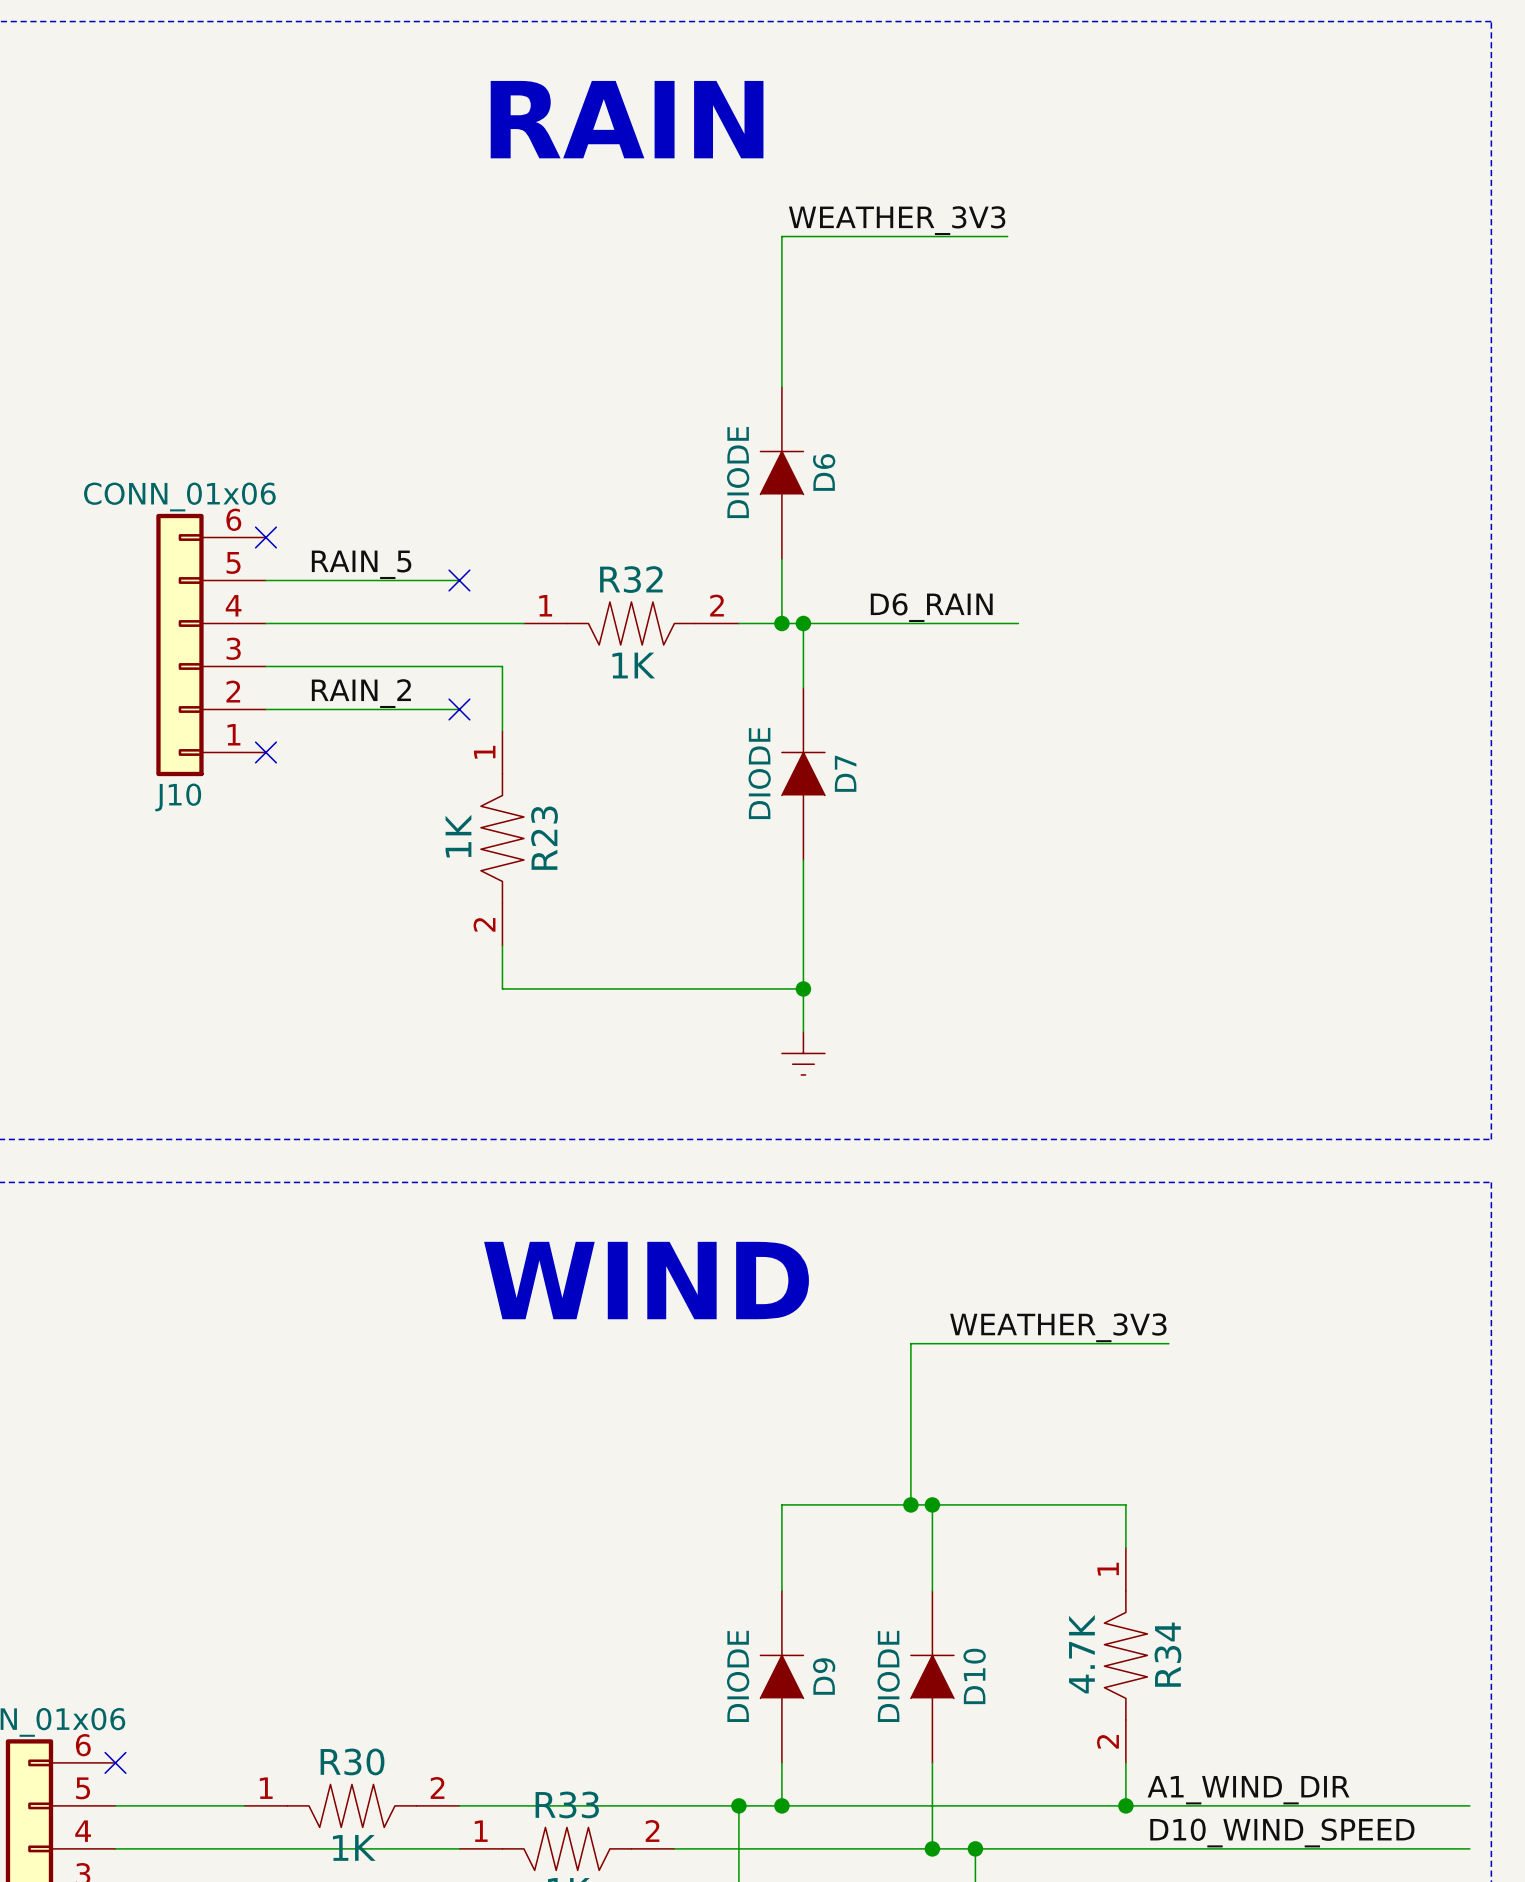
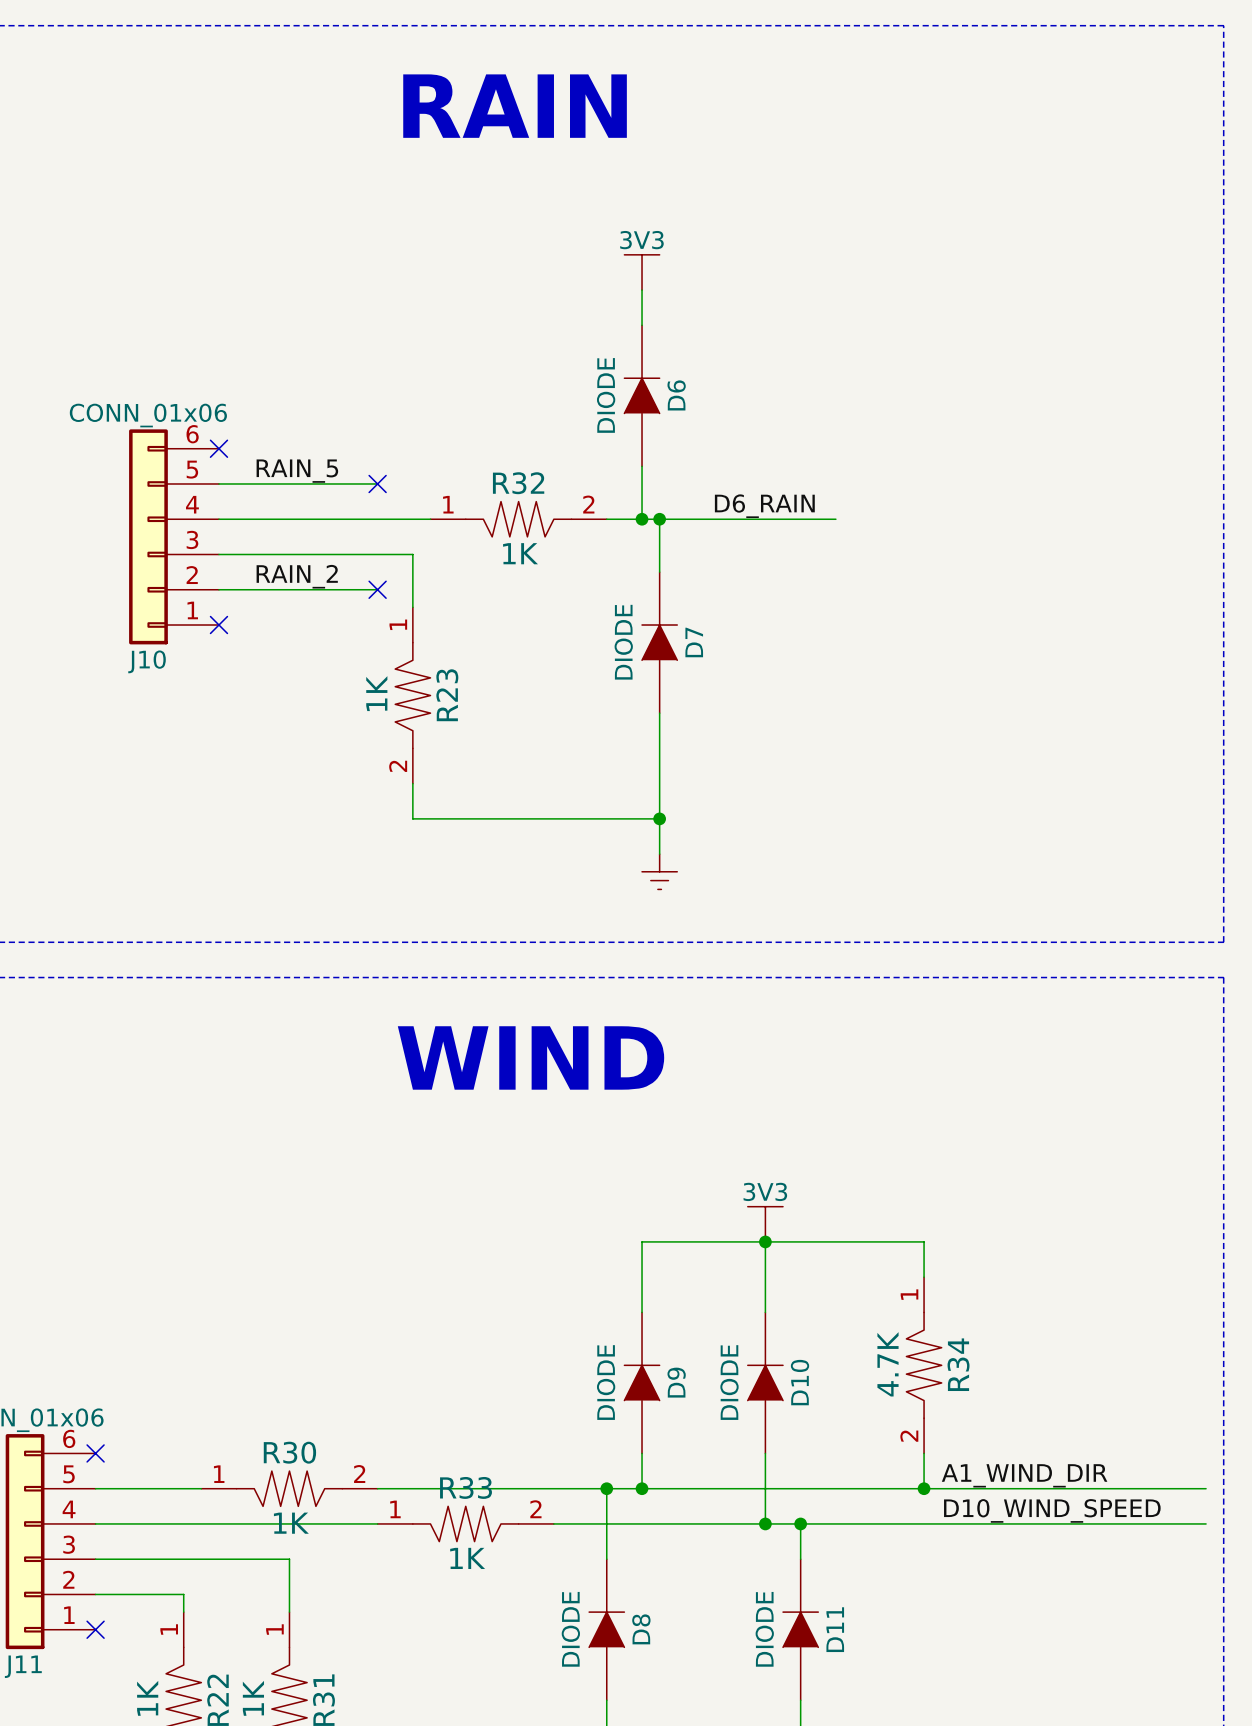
label: WEATHER_3V3 (897, 220) -> none
wire: (1007, 236) (781, 236) (781, 344) -> none
power symbol: none -> 3V3 (642, 272)
label: WEATHER_3V3 (1058, 1327) -> none
wire: (1168, 1343) (910, 1343) (910, 1504) -> none
power symbol: none -> 3V3 (765, 1224)
junction: (910, 1504) -> none

